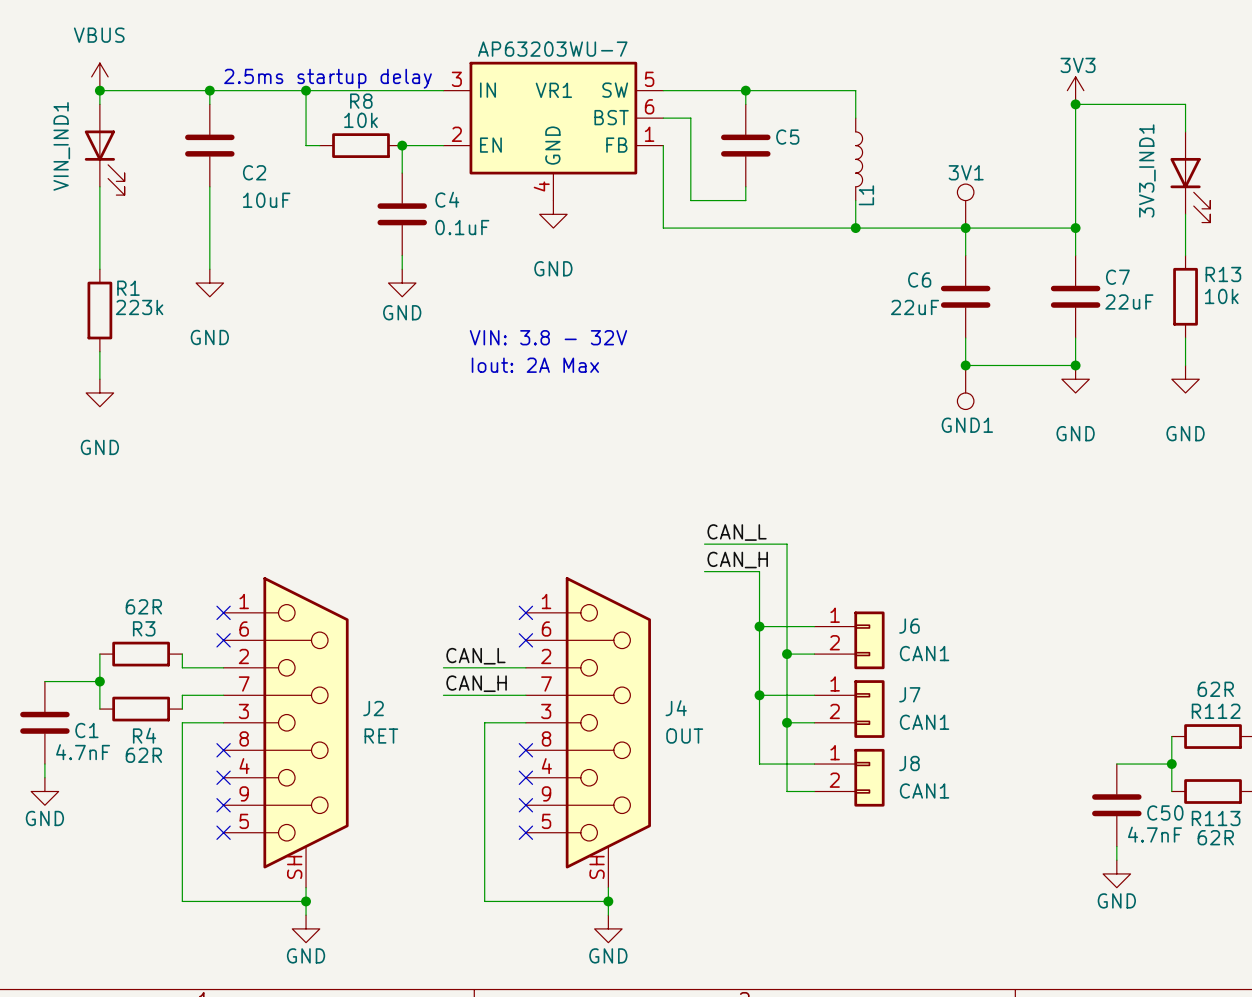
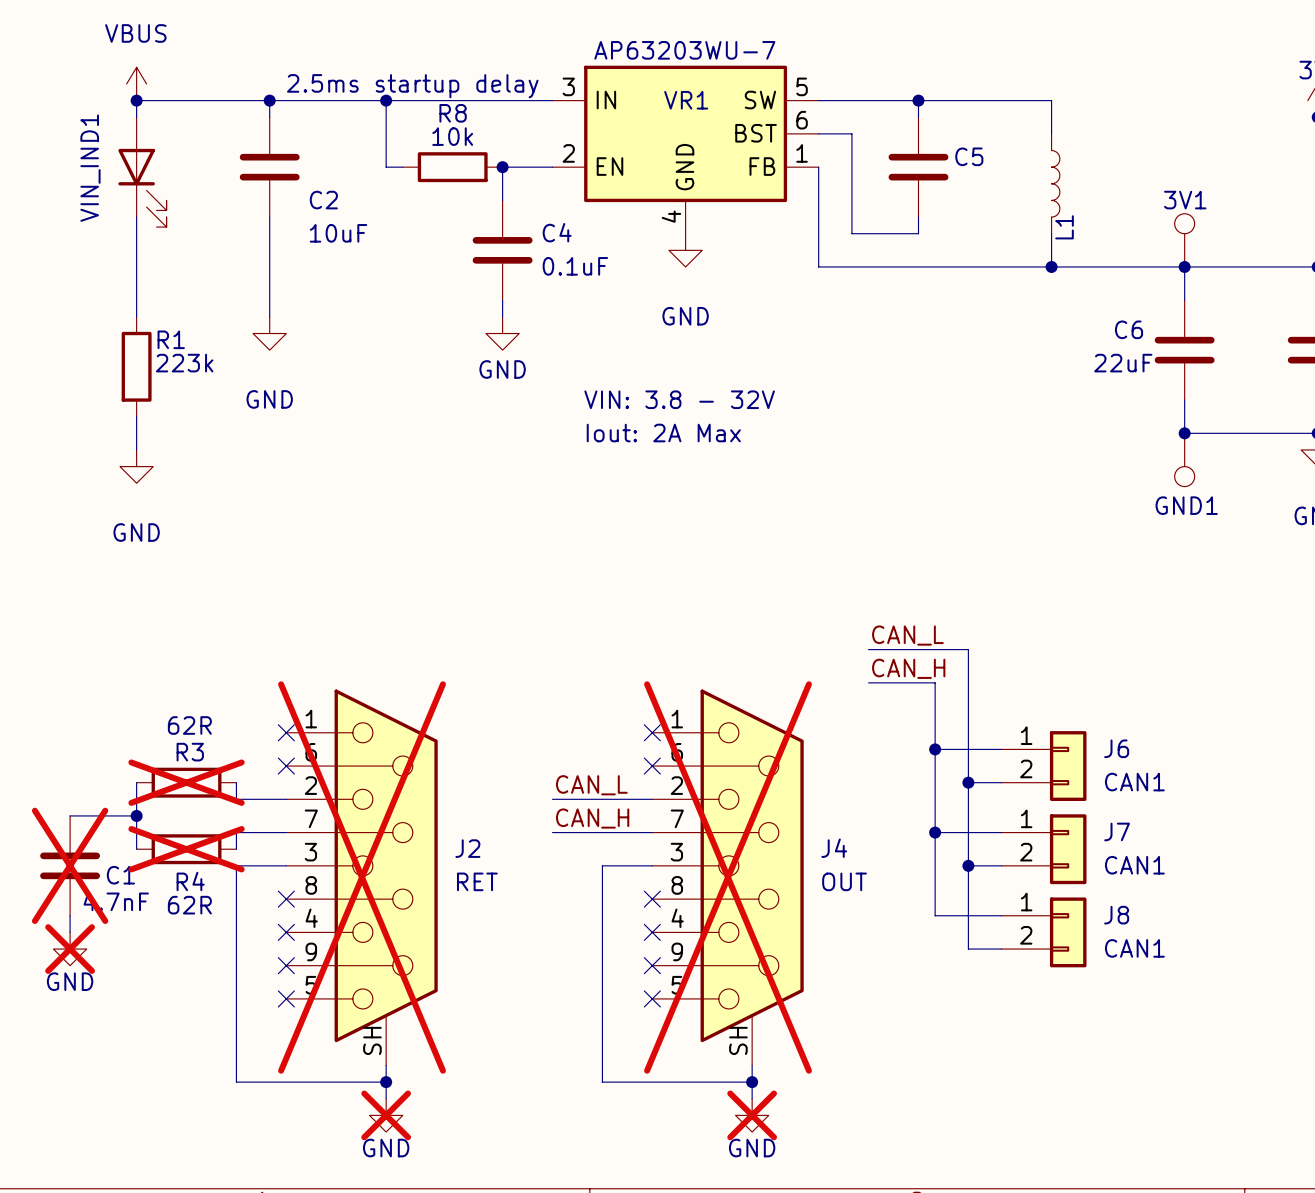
R3 do-not-place cross: none -> (186, 782)
R4 do-not-place cross: none -> (186, 849)
C1 do-not-place cross: none -> (70, 865)
J2 do-not-place cross: none -> (362, 877)
J4 do-not-place cross: none -> (728, 877)
power symbol do-not-place cross: none -> (70, 949)
power symbol do-not-place cross: none -> (386, 1115)
power symbol do-not-place cross: none -> (752, 1115)

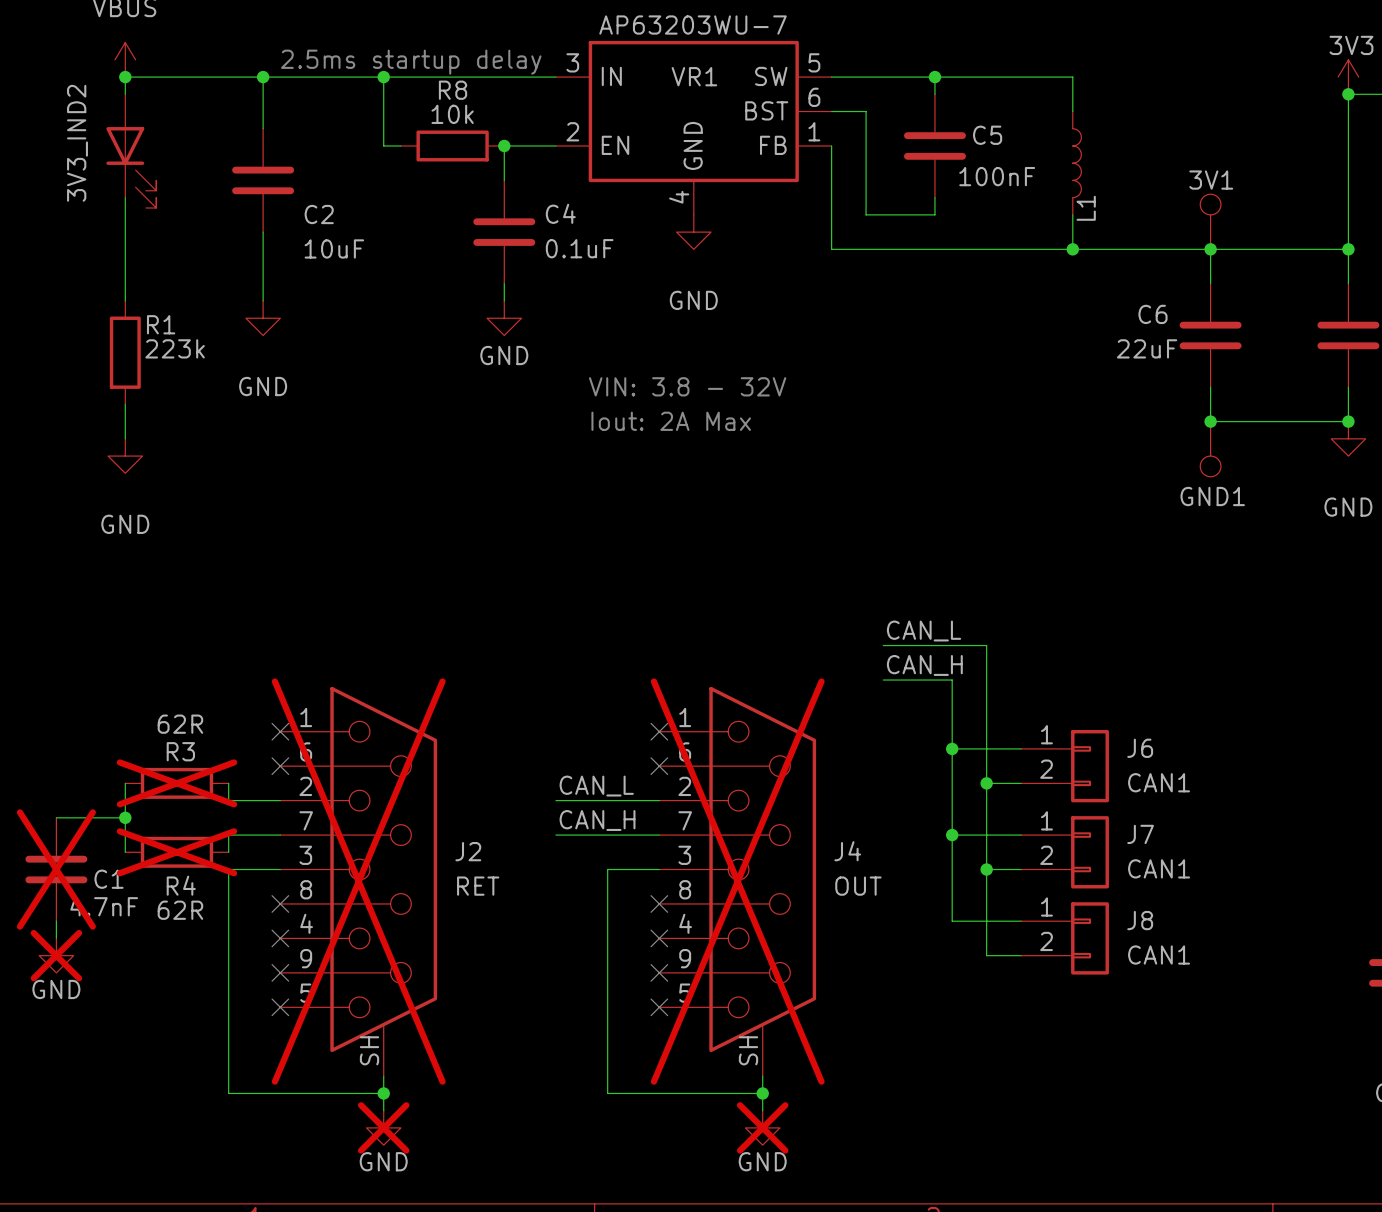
C2 position: (269, 167) -> (263, 180)
VIN_IND1 name: VIN_IND1 (90, 168) -> 3V3_IND2 (77, 143)
C5 value: none -> 100nF (997, 176)

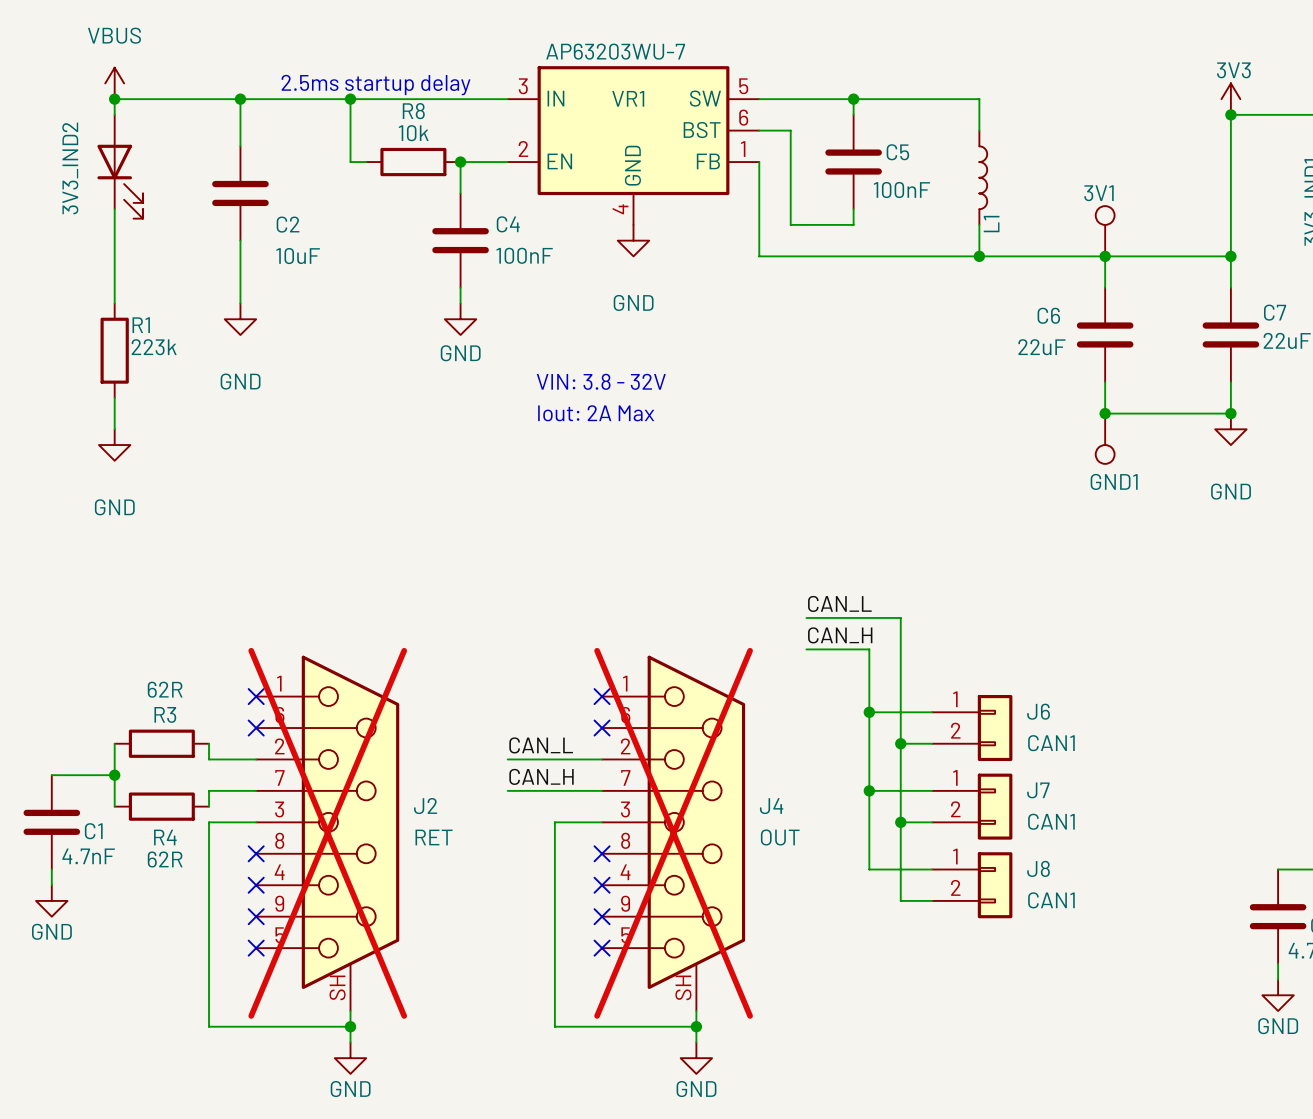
C4 value: 0.1uF (579, 248) -> 100nF (524, 255)
R3 do-not-place cross: (176, 783) -> none
R4 do-not-place cross: (176, 852) -> none
C1 do-not-place cross: (56, 869) -> none
power symbol do-not-place cross: (56, 955) -> none
power symbol do-not-place cross: (383, 1127) -> none
power symbol do-not-place cross: (762, 1127) -> none

